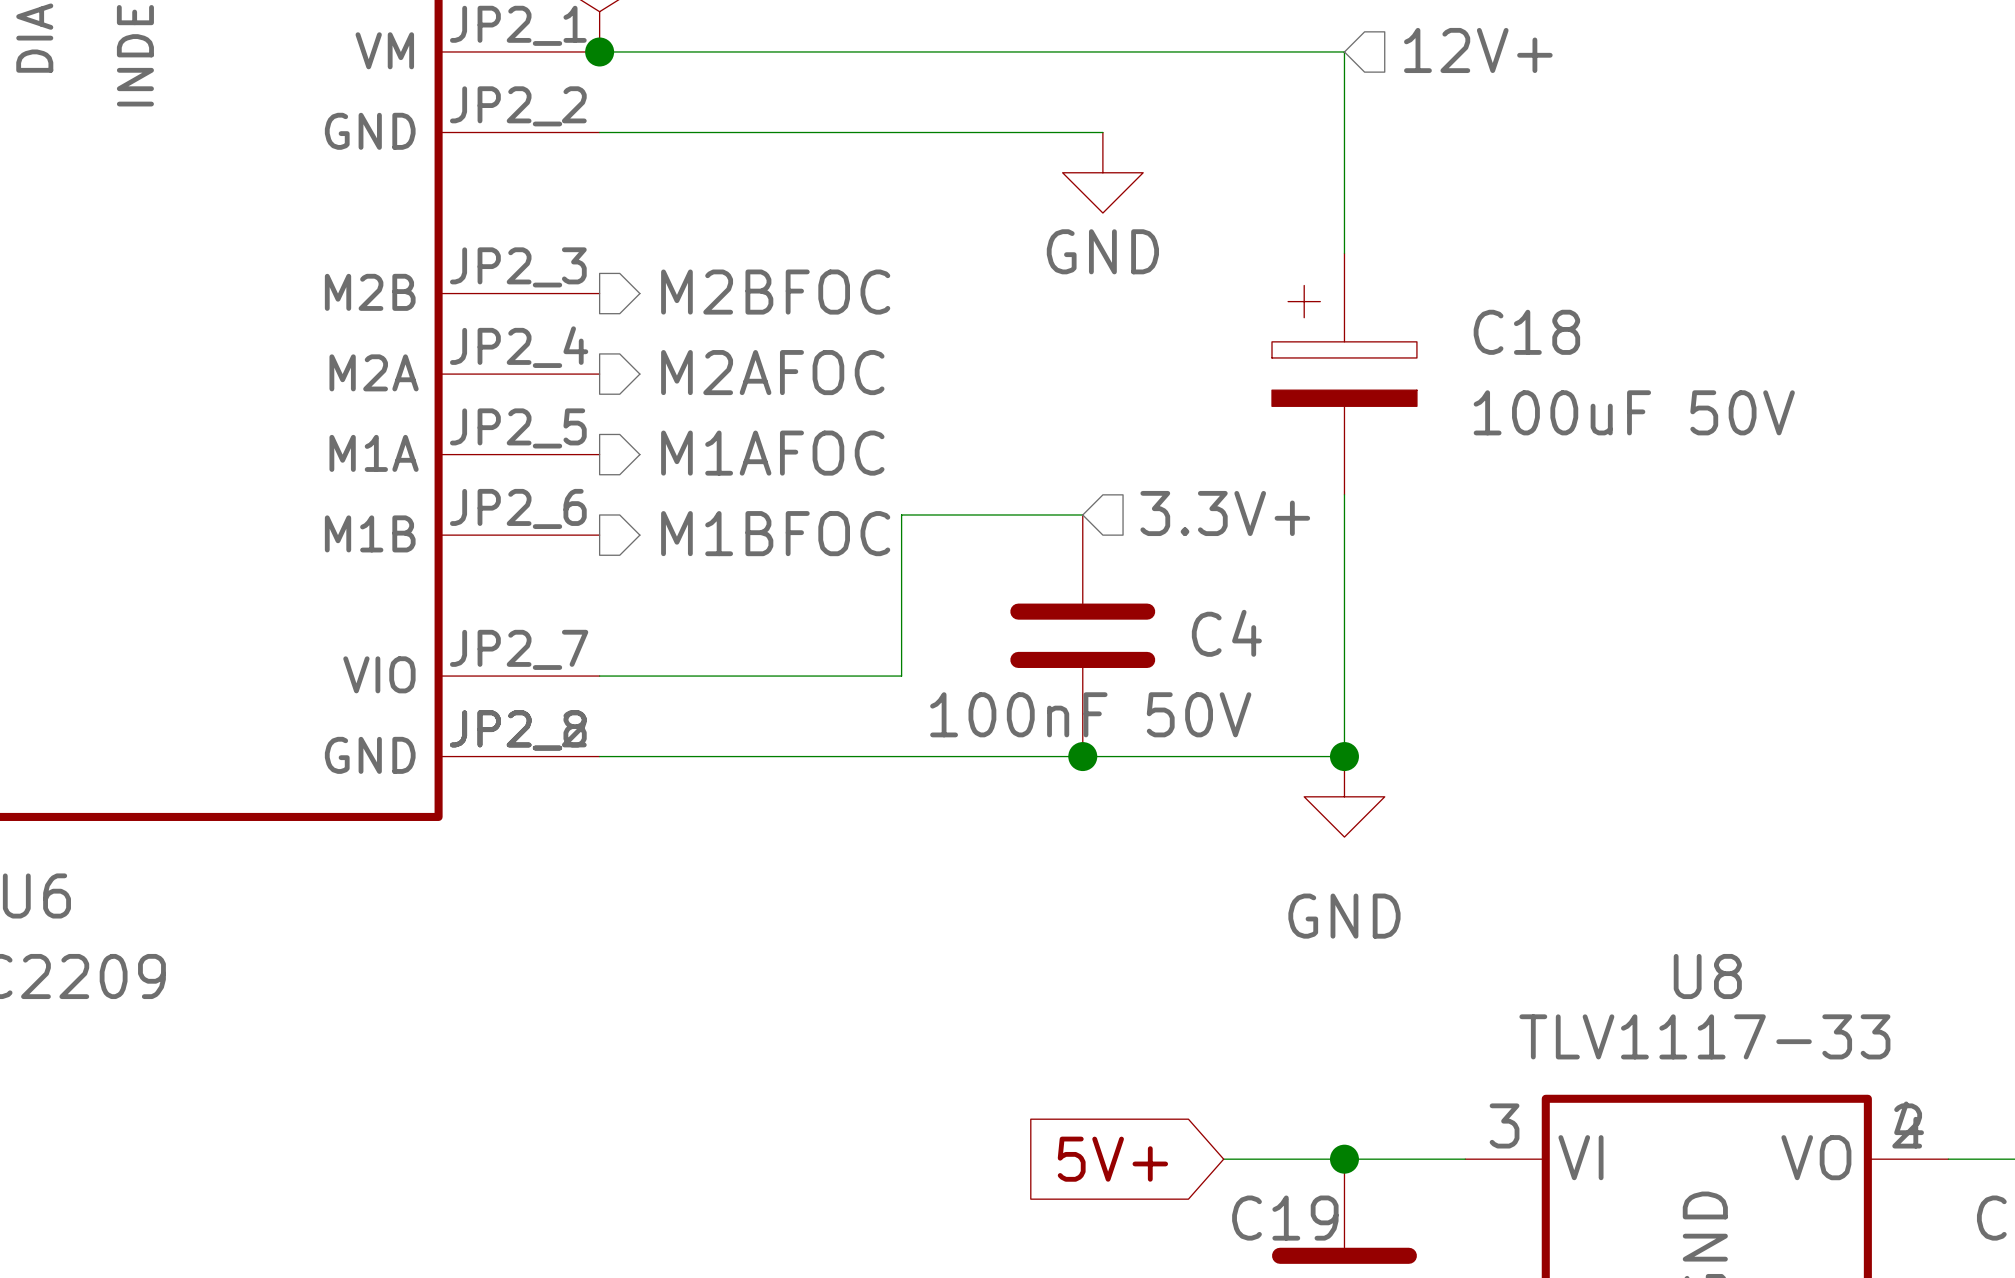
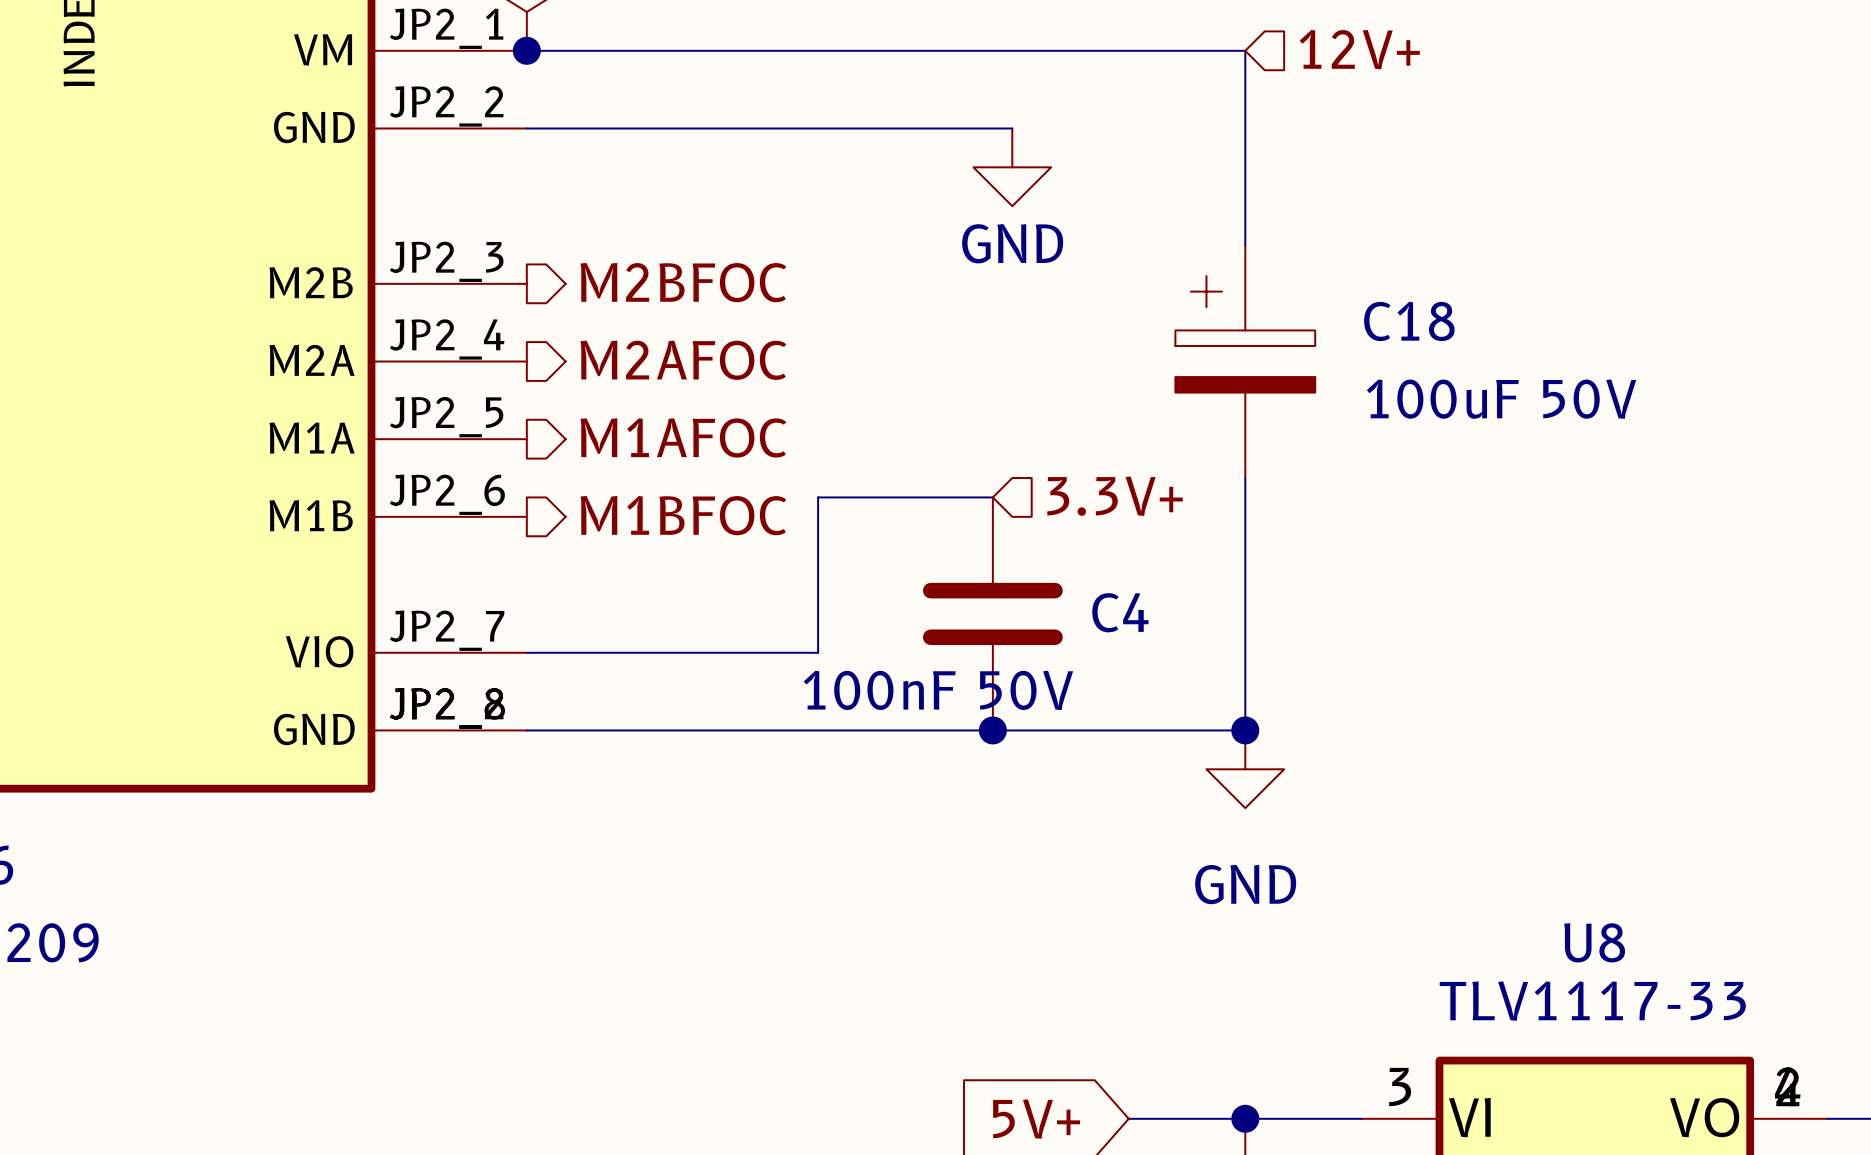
C4 value position: 100nF 50V (1090, 714) -> 100nF 50V (938, 690)

